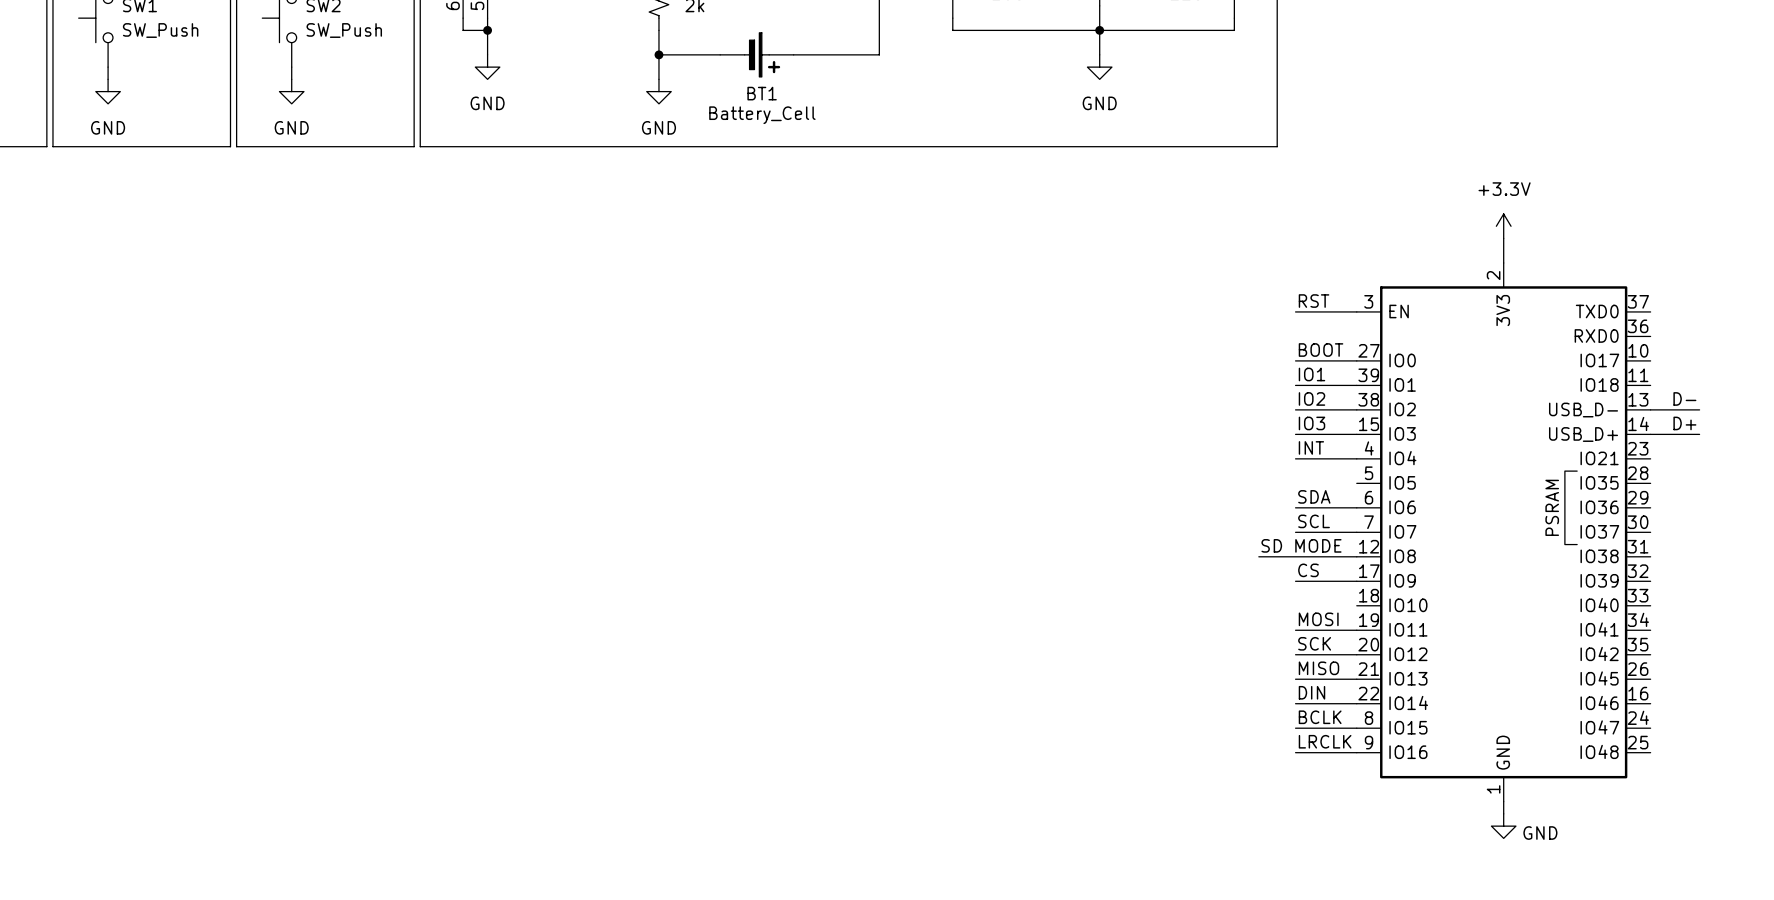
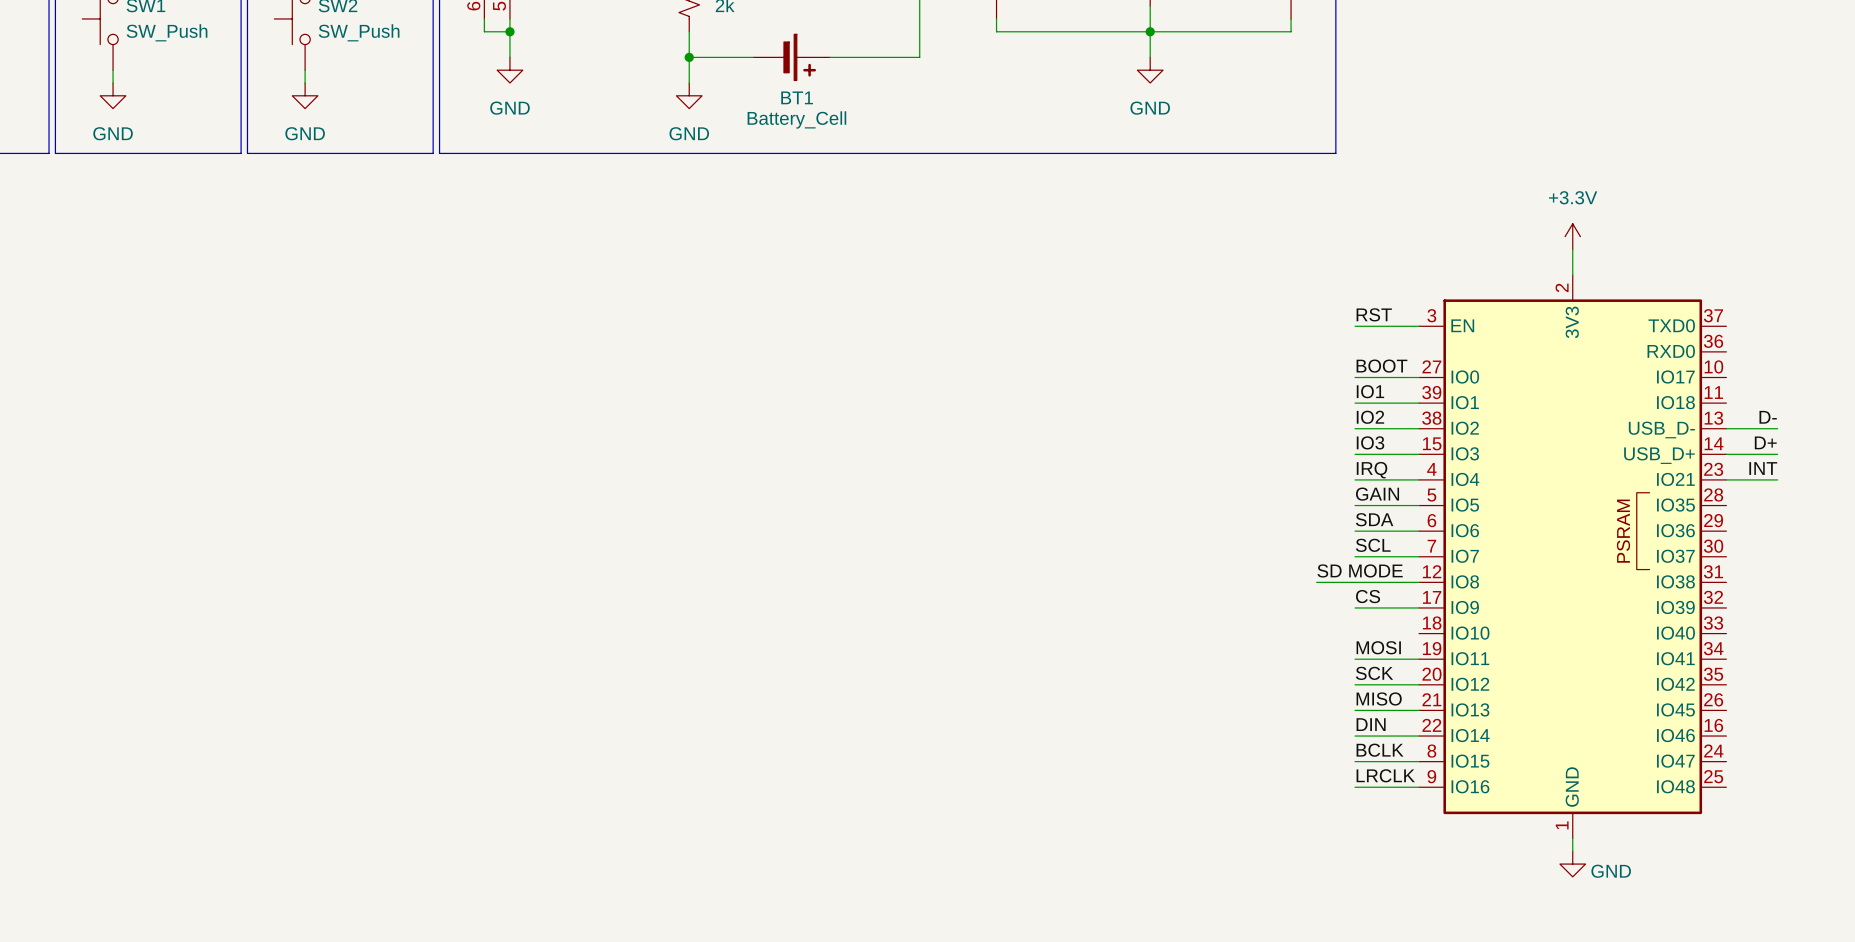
label: INT (1311, 447) -> IRQ (1372, 470)
label: none -> INT (1763, 468)
wire: none -> (1726, 479) (1777, 479)
label: none -> GAIN (1377, 494)
wire: none -> (1355, 505) (1419, 505)

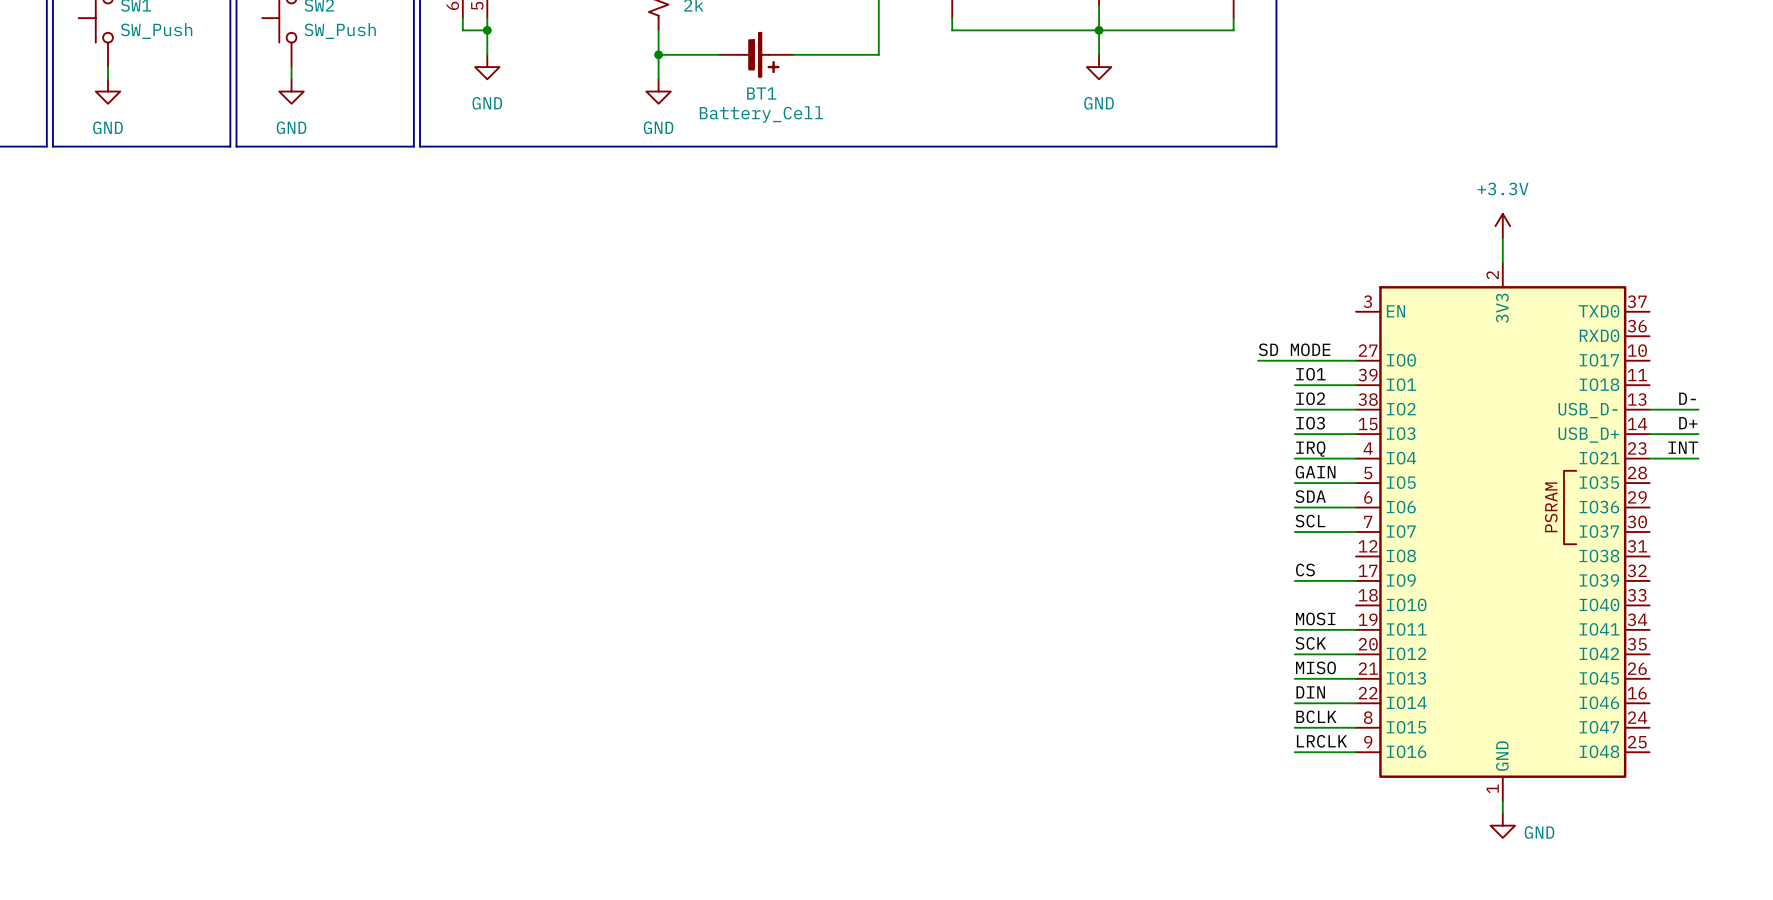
label: RST (1374, 314) -> none
wire: (1355, 326) (1419, 326) -> none
label: BOOT (1381, 366) -> none
wire: none -> (1258, 360) (1294, 360)
label position: SD MODE (1360, 570) -> SD MODE (1294, 349)
wire: (1316, 582) (1419, 582) -> none

